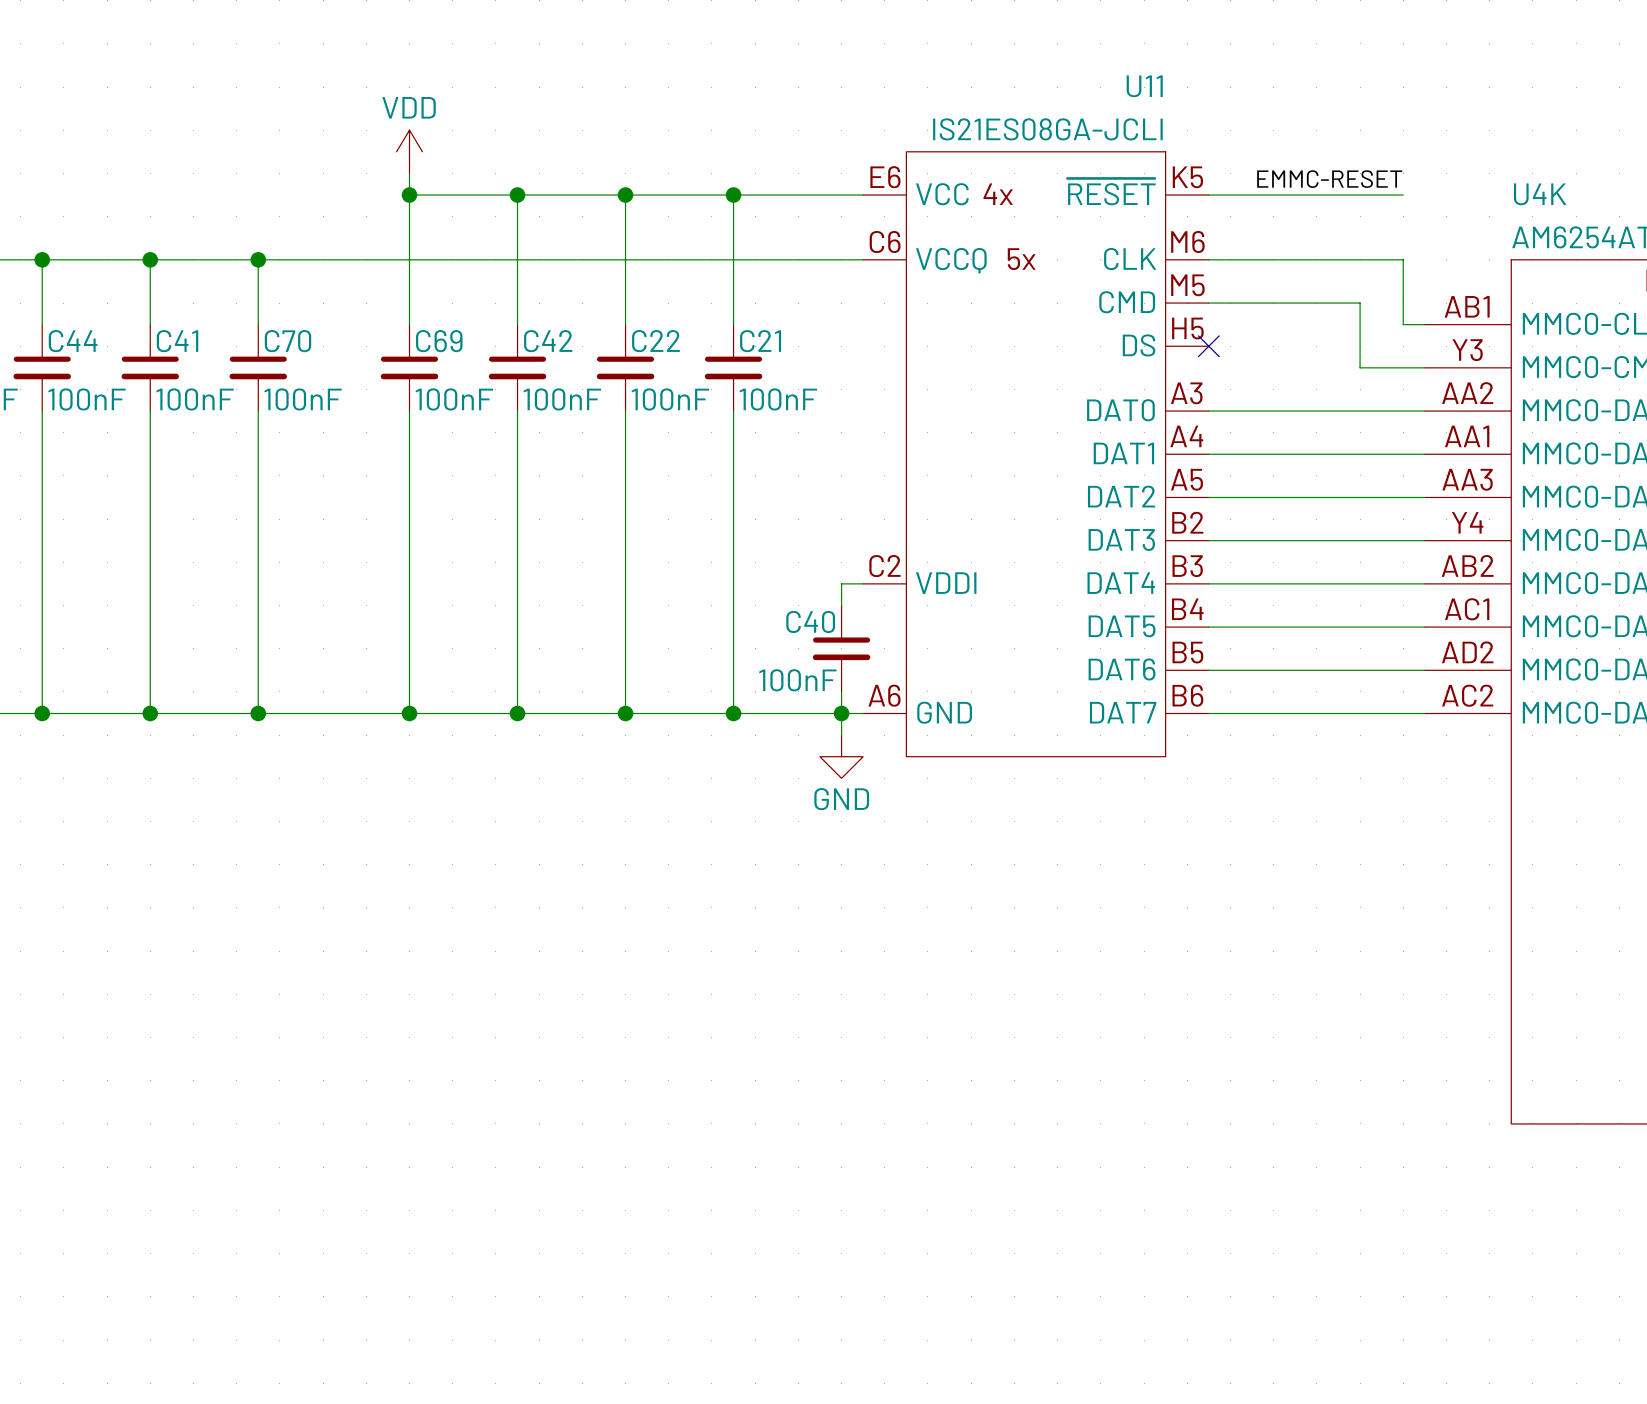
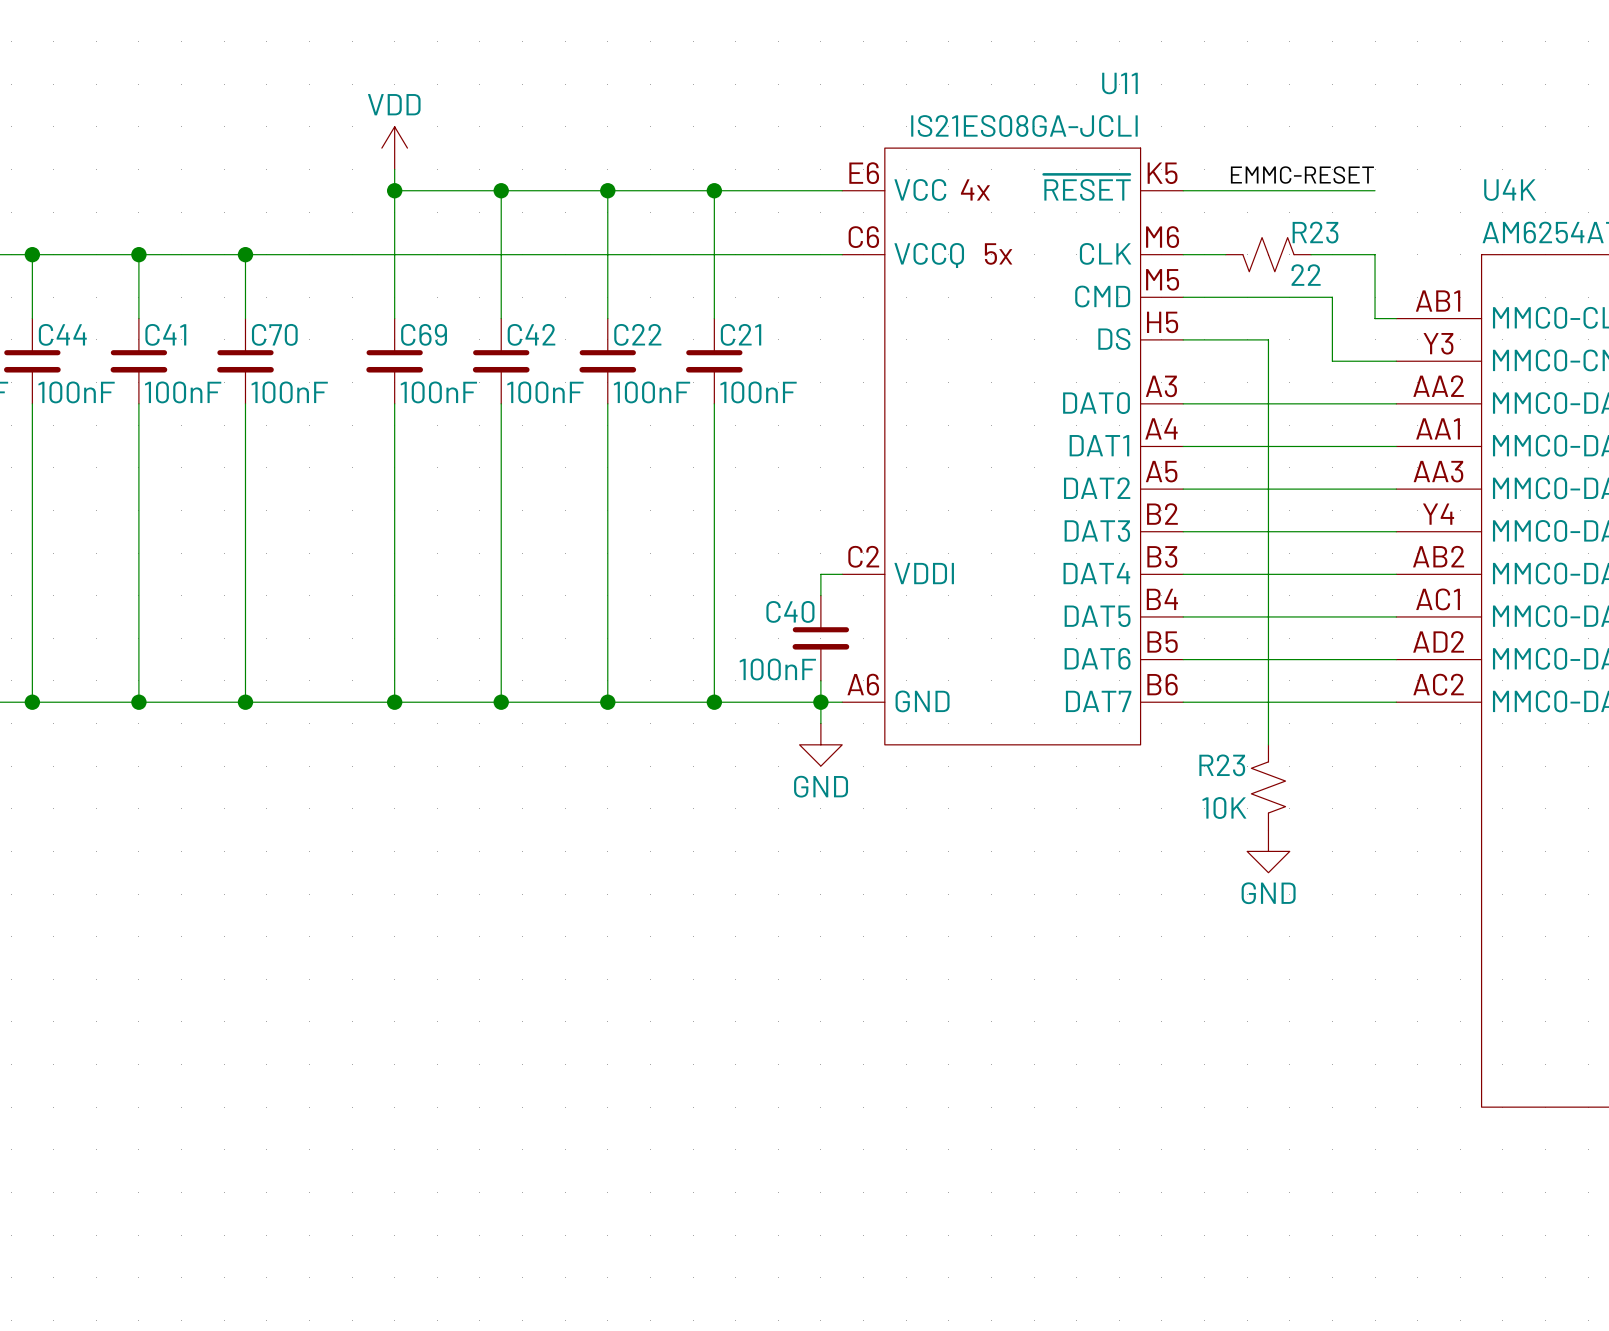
wire: (1252, 259) (1338, 259) -> none
R23: none -> 22 (1268, 254)
wire: none -> (1183, 339) (1268, 339) (1268, 744)
no-connect mark: (1208, 346) -> none
R23: none -> 10K (1268, 787)
power symbol: none -> GND (1268, 851)

